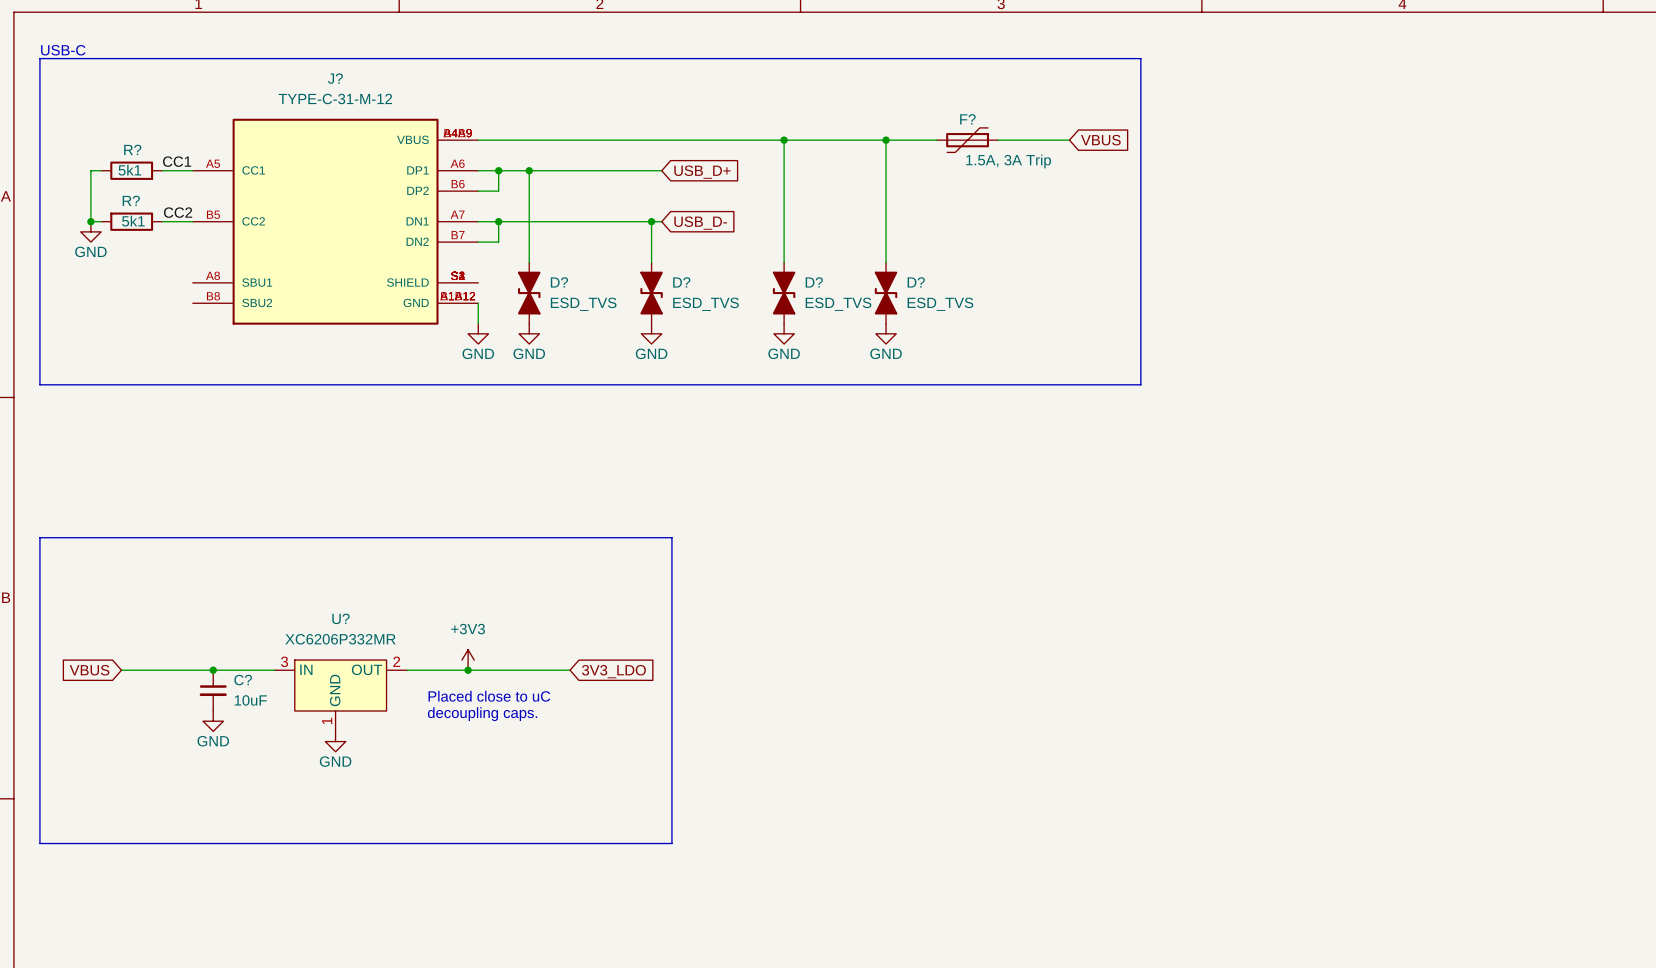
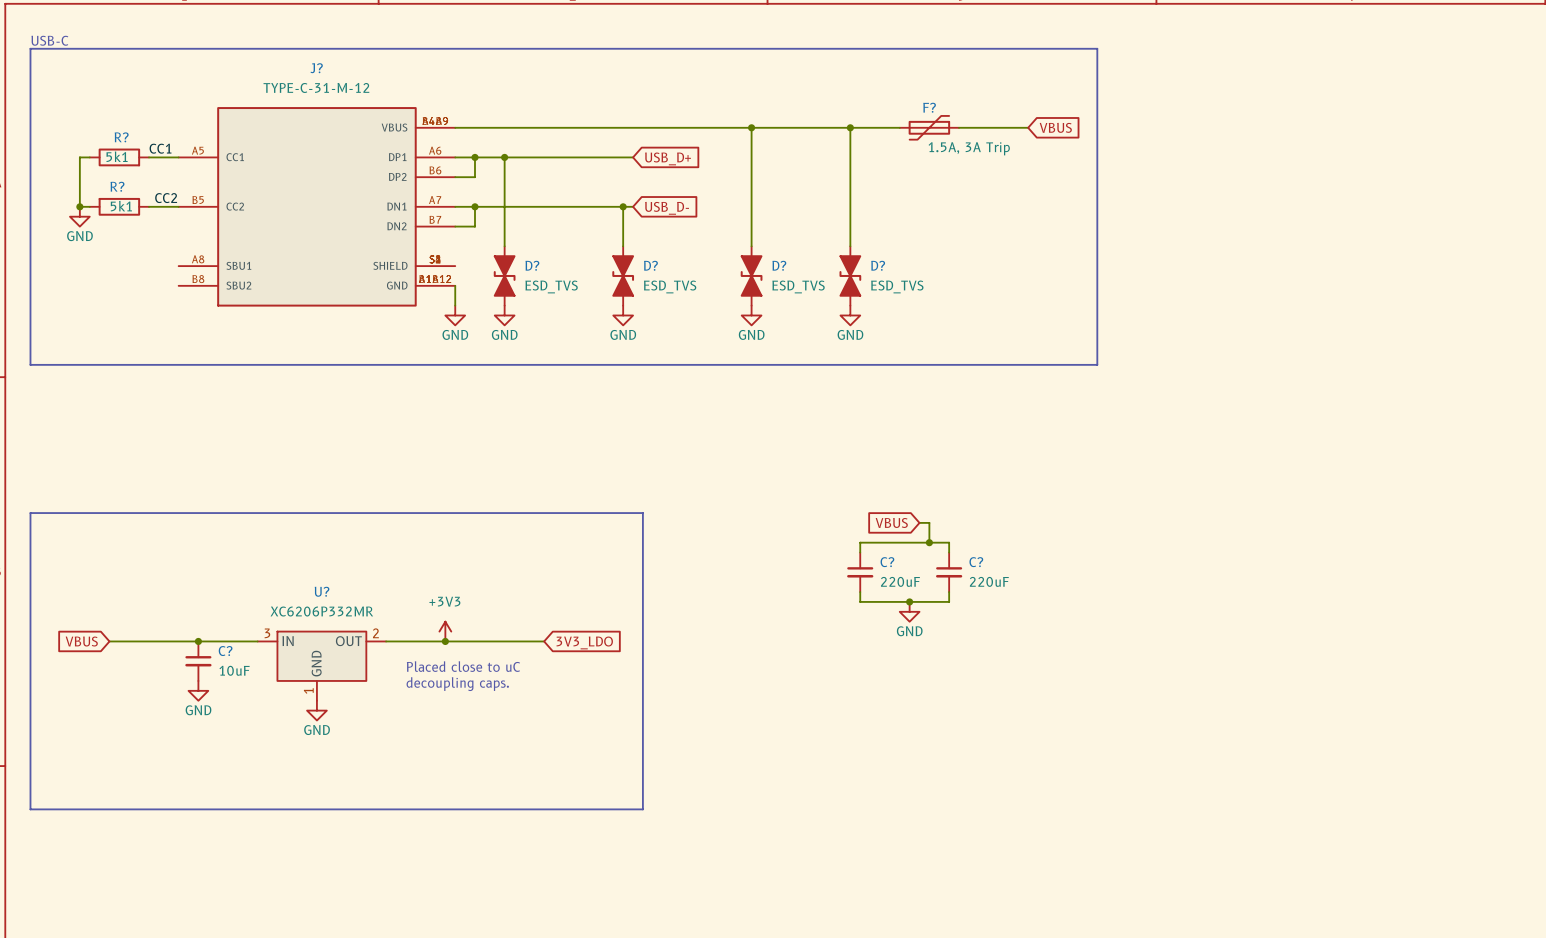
global label: none -> VBUS (891, 522)
wire: none -> (919, 522) (929, 522) (929, 542)
junction: none -> (929, 542)
wire: none -> (860, 552) (860, 542) (949, 542) (949, 552)
C?: none -> 220uF (860, 572)
C?: none -> 220uF (949, 572)
wire: none -> (860, 592) (860, 601) (949, 601) (949, 592)
junction: none -> (909, 601)
power symbol: none -> GND (909, 611)

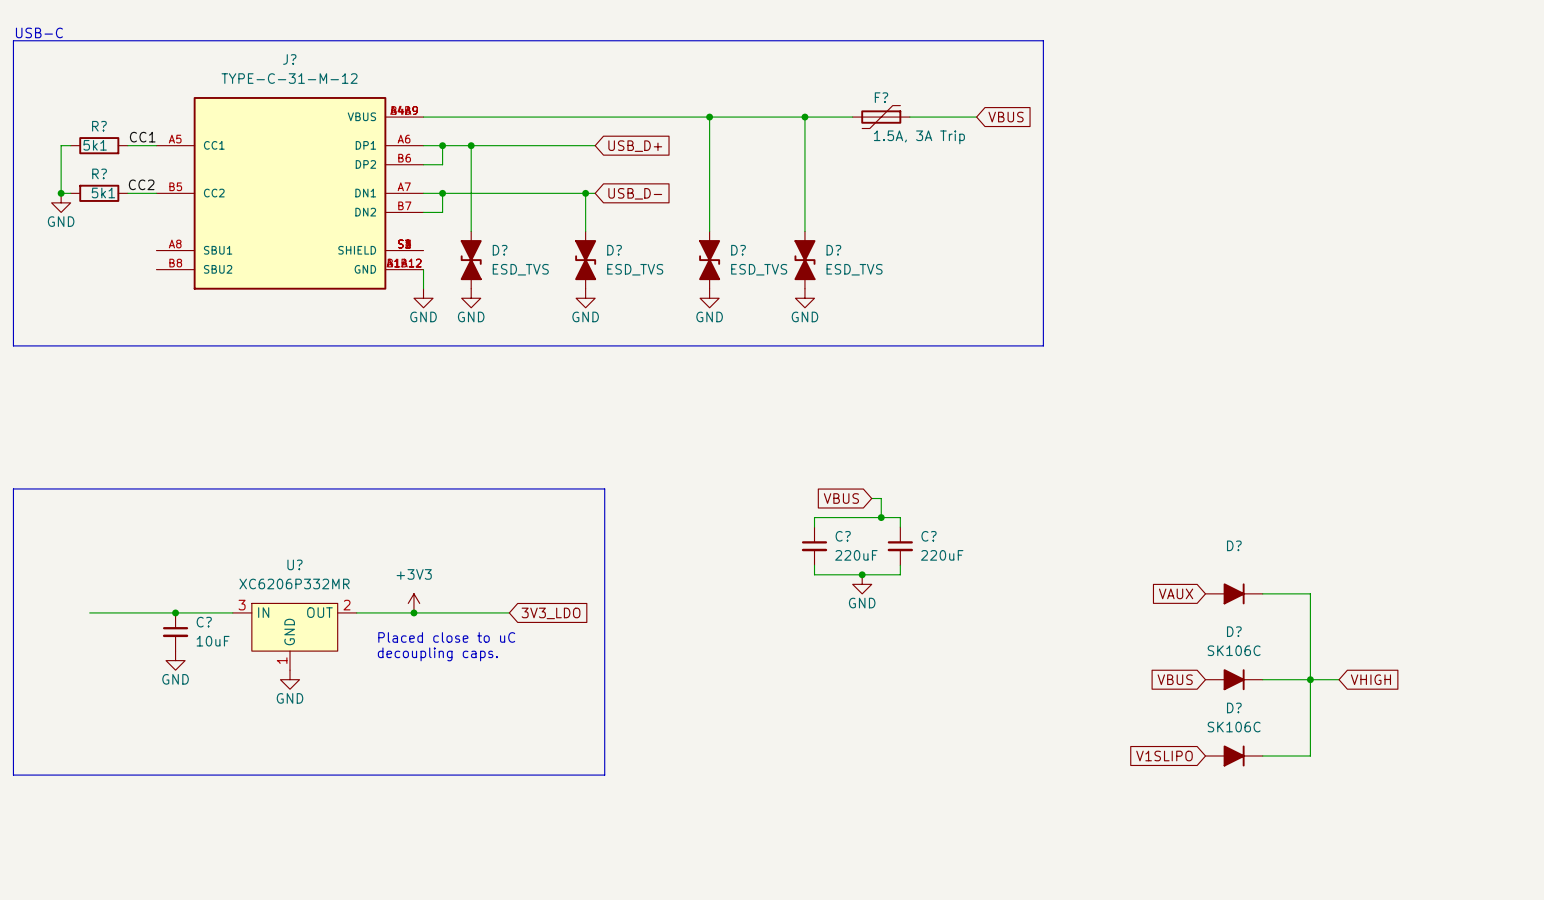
global label: none -> VAUX (1176, 593)
D?: none -> (1234, 593)
wire: none -> (1262, 593) (1310, 593) (1310, 756) (1262, 756)
global label: VBUS (81, 641) -> none
global label: none -> VBUS (1175, 679)
D?: none -> SK106C (1234, 679)
wire: none -> (1262, 679) (1339, 679)
junction: none -> (1310, 679)
global label: none -> VHIGH (1370, 679)
global label: none -> V1SLIPO (1164, 756)
D?: none -> SK106C (1234, 756)

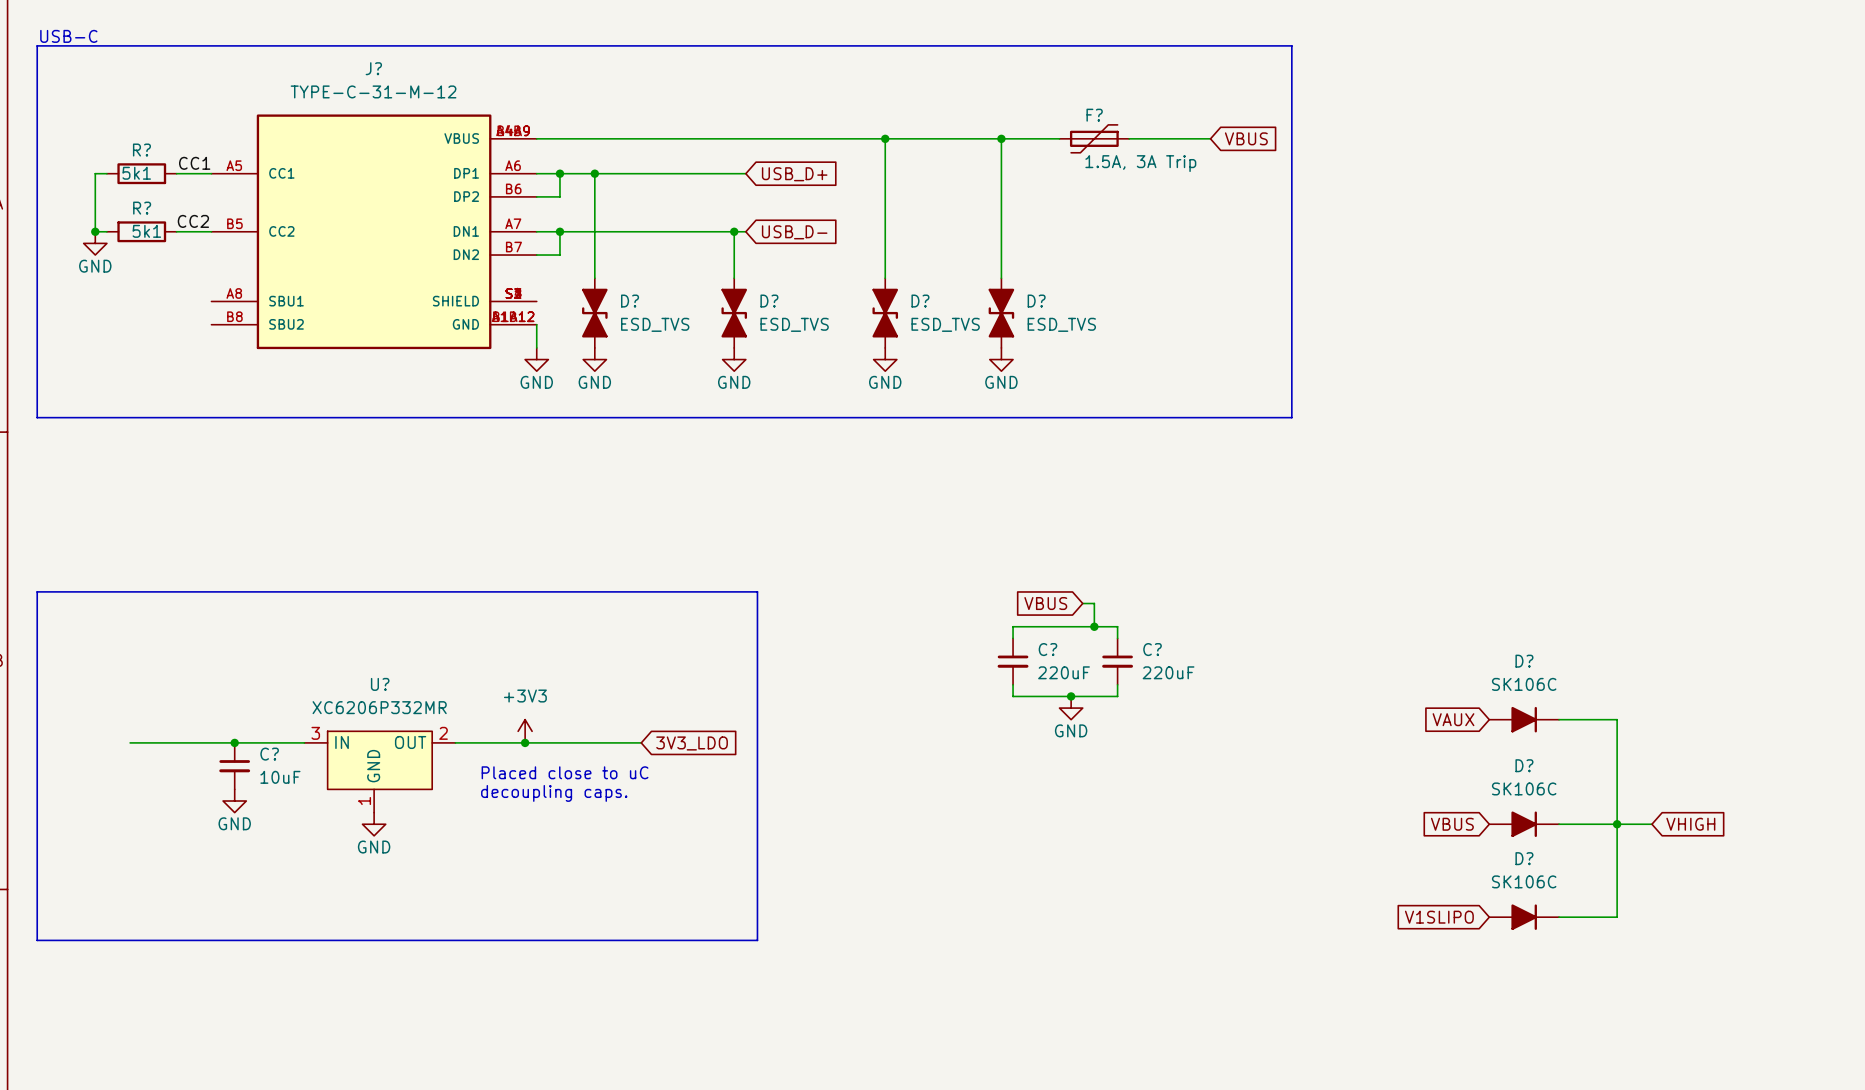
D? value: none -> SK106C (1524, 684)

